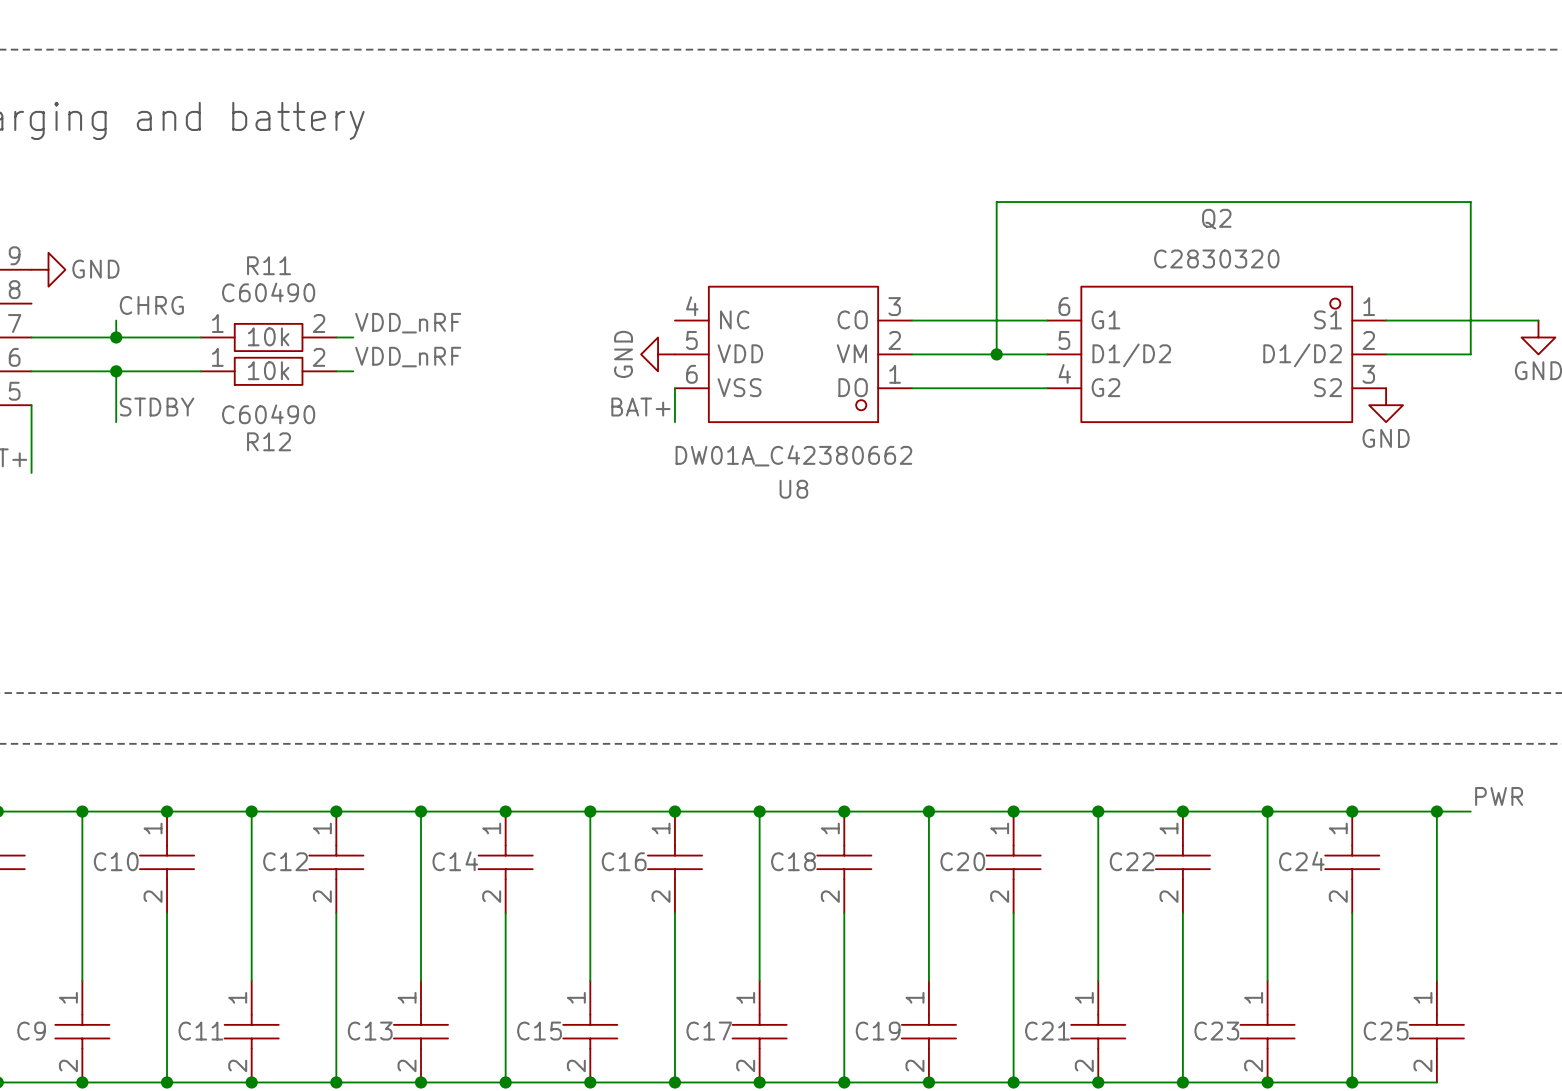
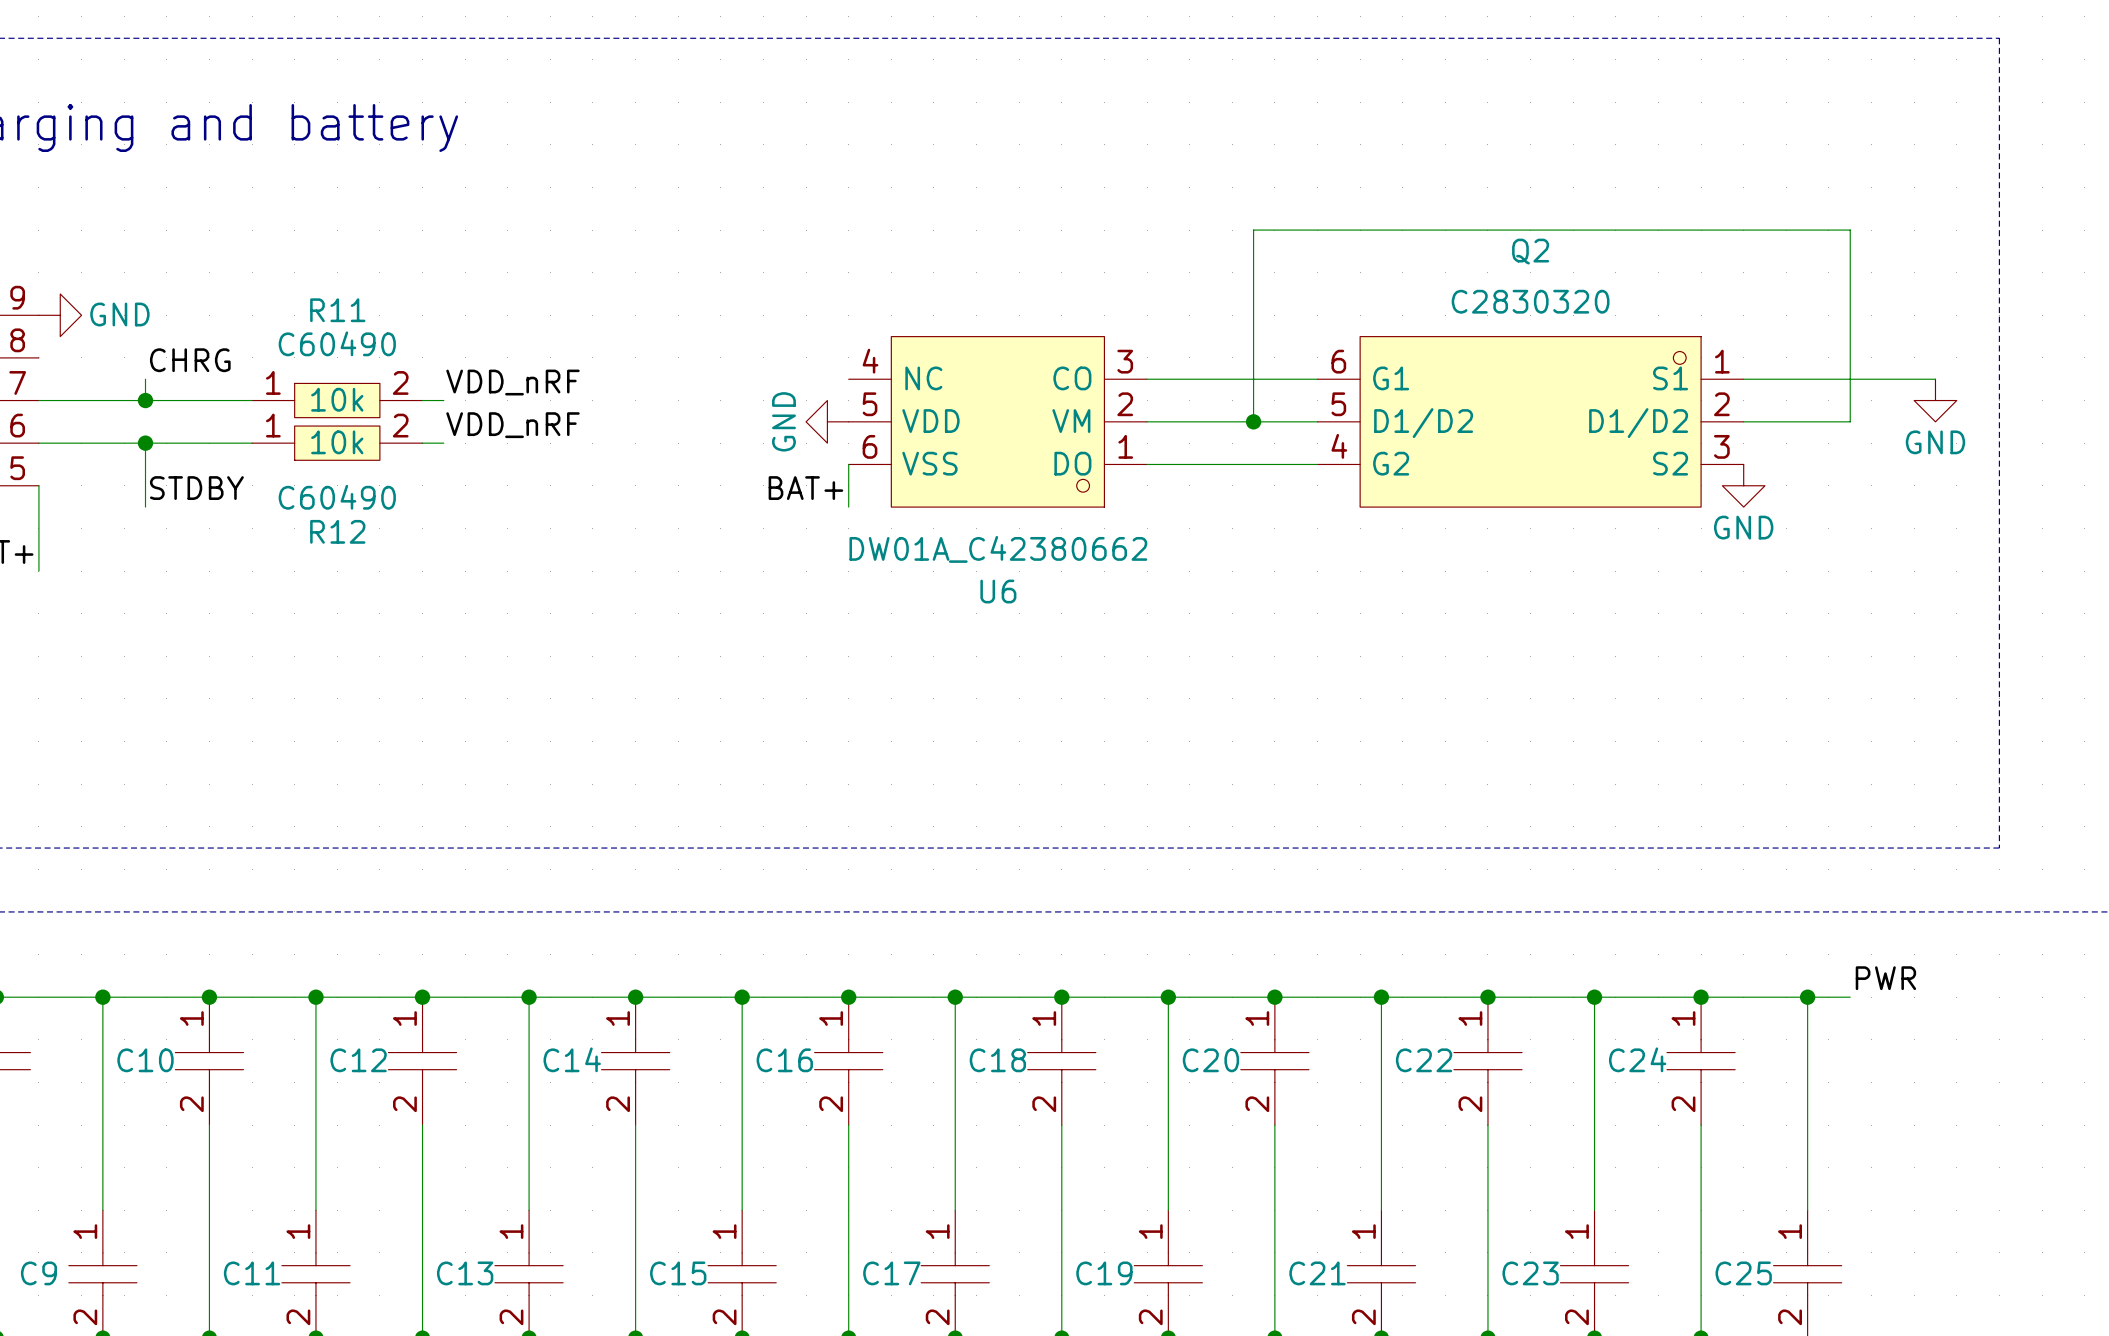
U8 name: U8 (793, 489) -> U6 (998, 591)

